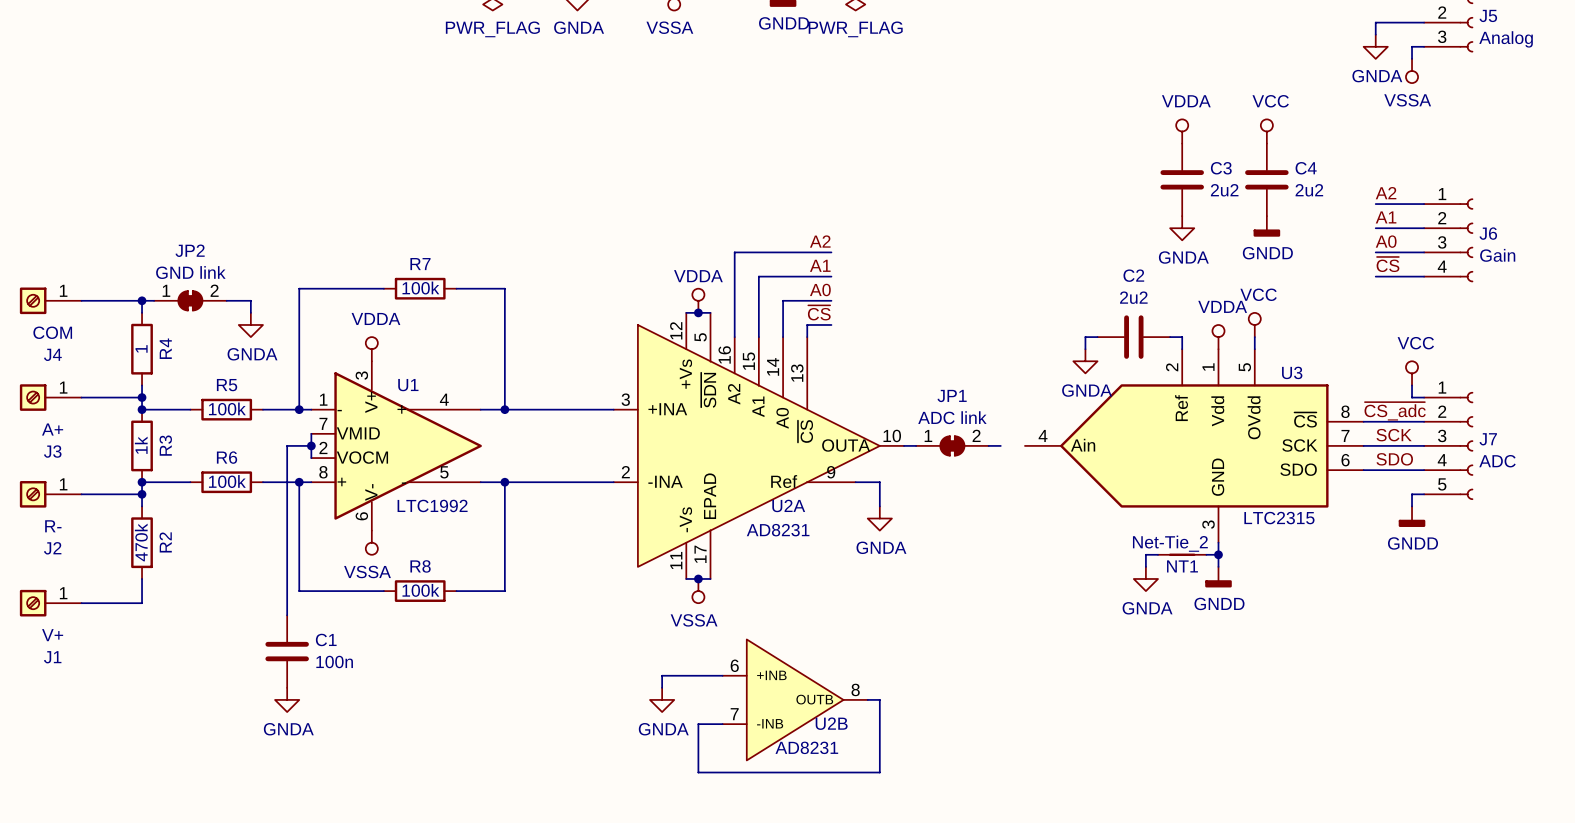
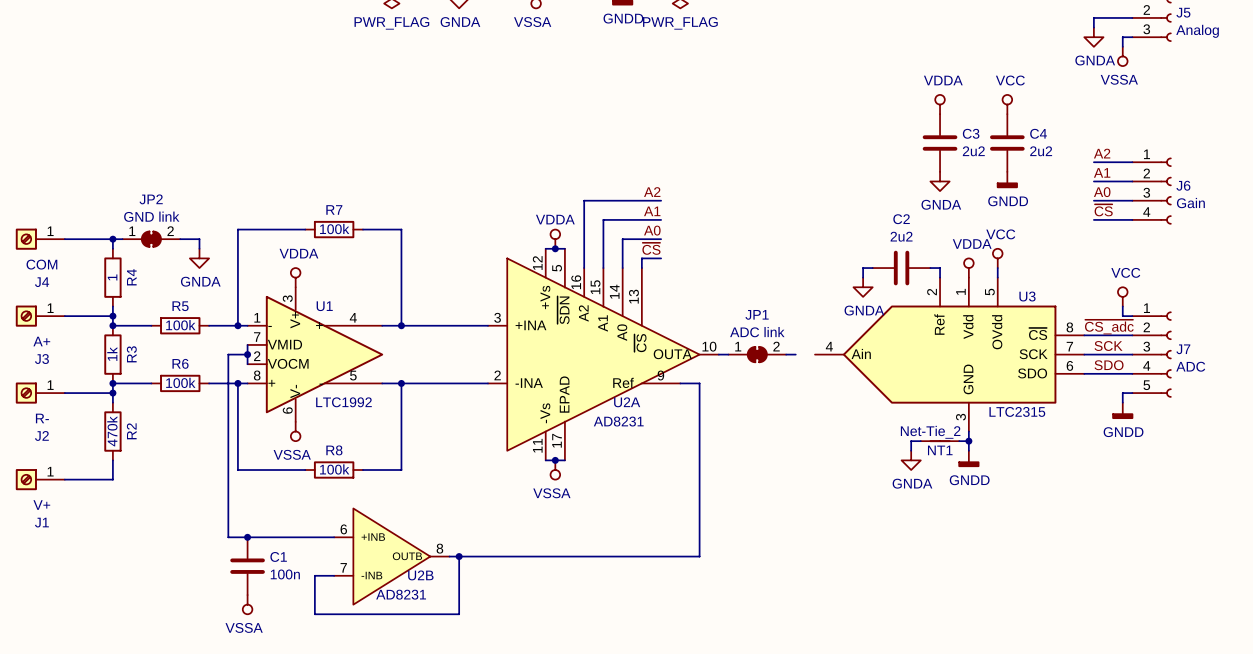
power symbol: GNDA (879, 518) -> none
wire: none -> (228, 489) (228, 537) (334, 537)
C1 position: (287, 651) -> (247, 566)
junction: none -> (247, 537)
wire: (722, 675) (662, 675) (662, 687) -> none
power symbol: GNDA (287, 699) -> none
wire: none -> (449, 556) (689, 556)
wire: none -> (459, 556) (459, 614) (314, 614) (314, 575) (334, 575)
junction: none -> (459, 556)
power symbol: GNDA (662, 699) -> none
U2B position: (795, 699) -> (391, 556)
wire: (879, 699) (879, 772) (698, 772) (698, 724) (722, 724) -> (699, 556) (699, 402)
power symbol: none -> VSSA (247, 604)

